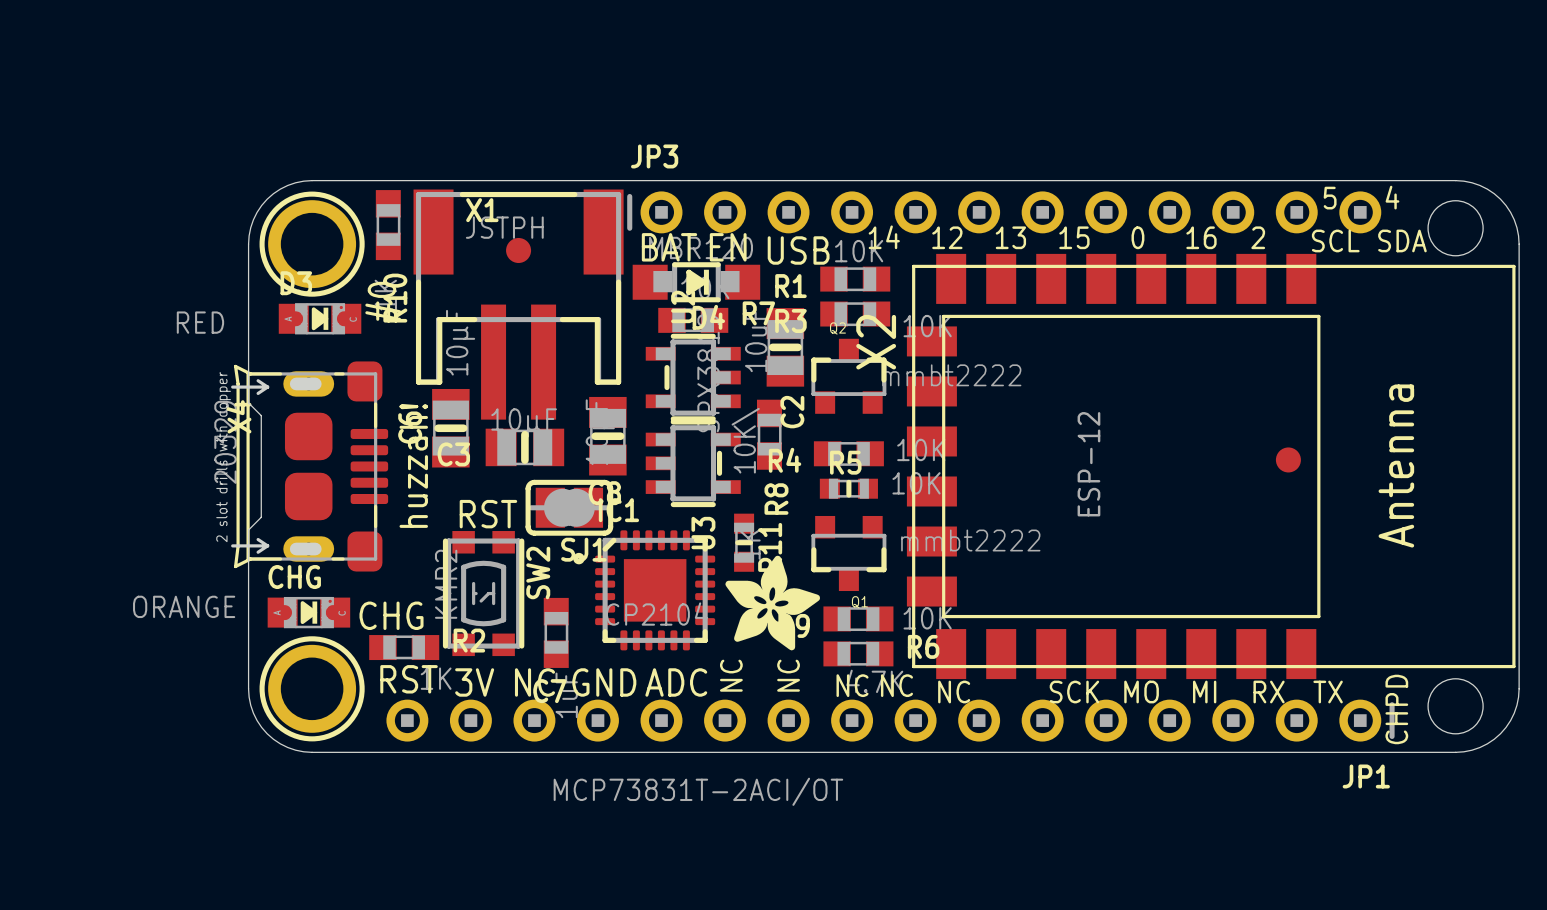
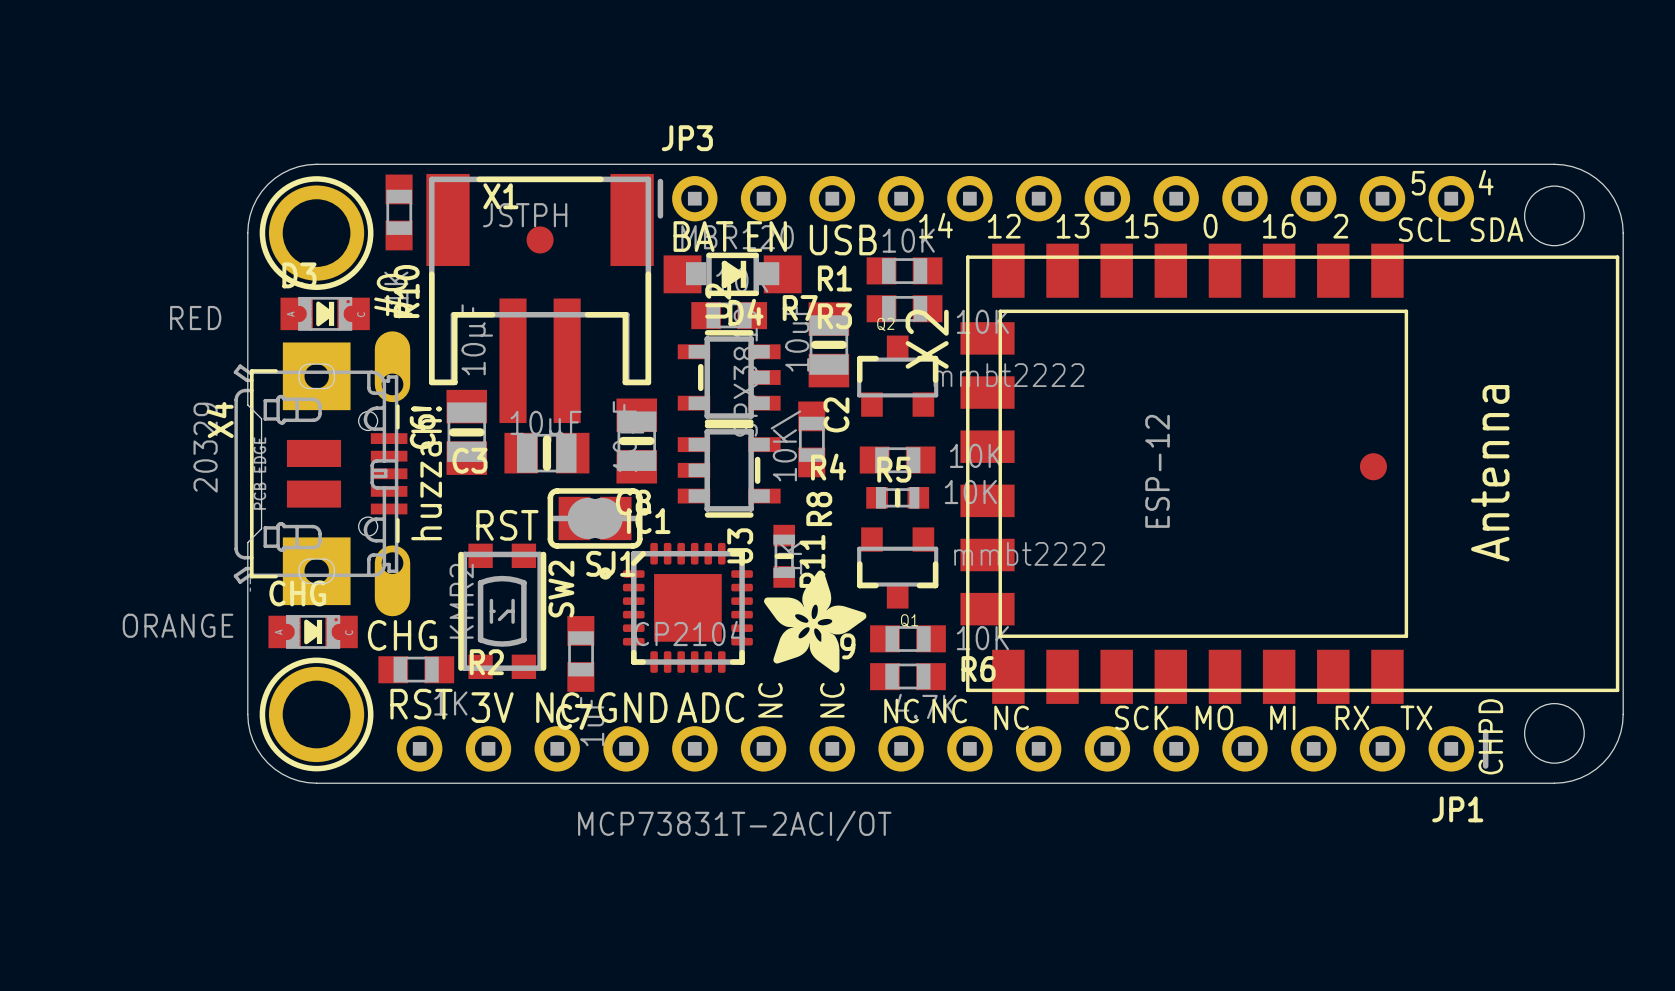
X4 footprint: [231, 361, 389, 572] -> [233, 331, 411, 617]

